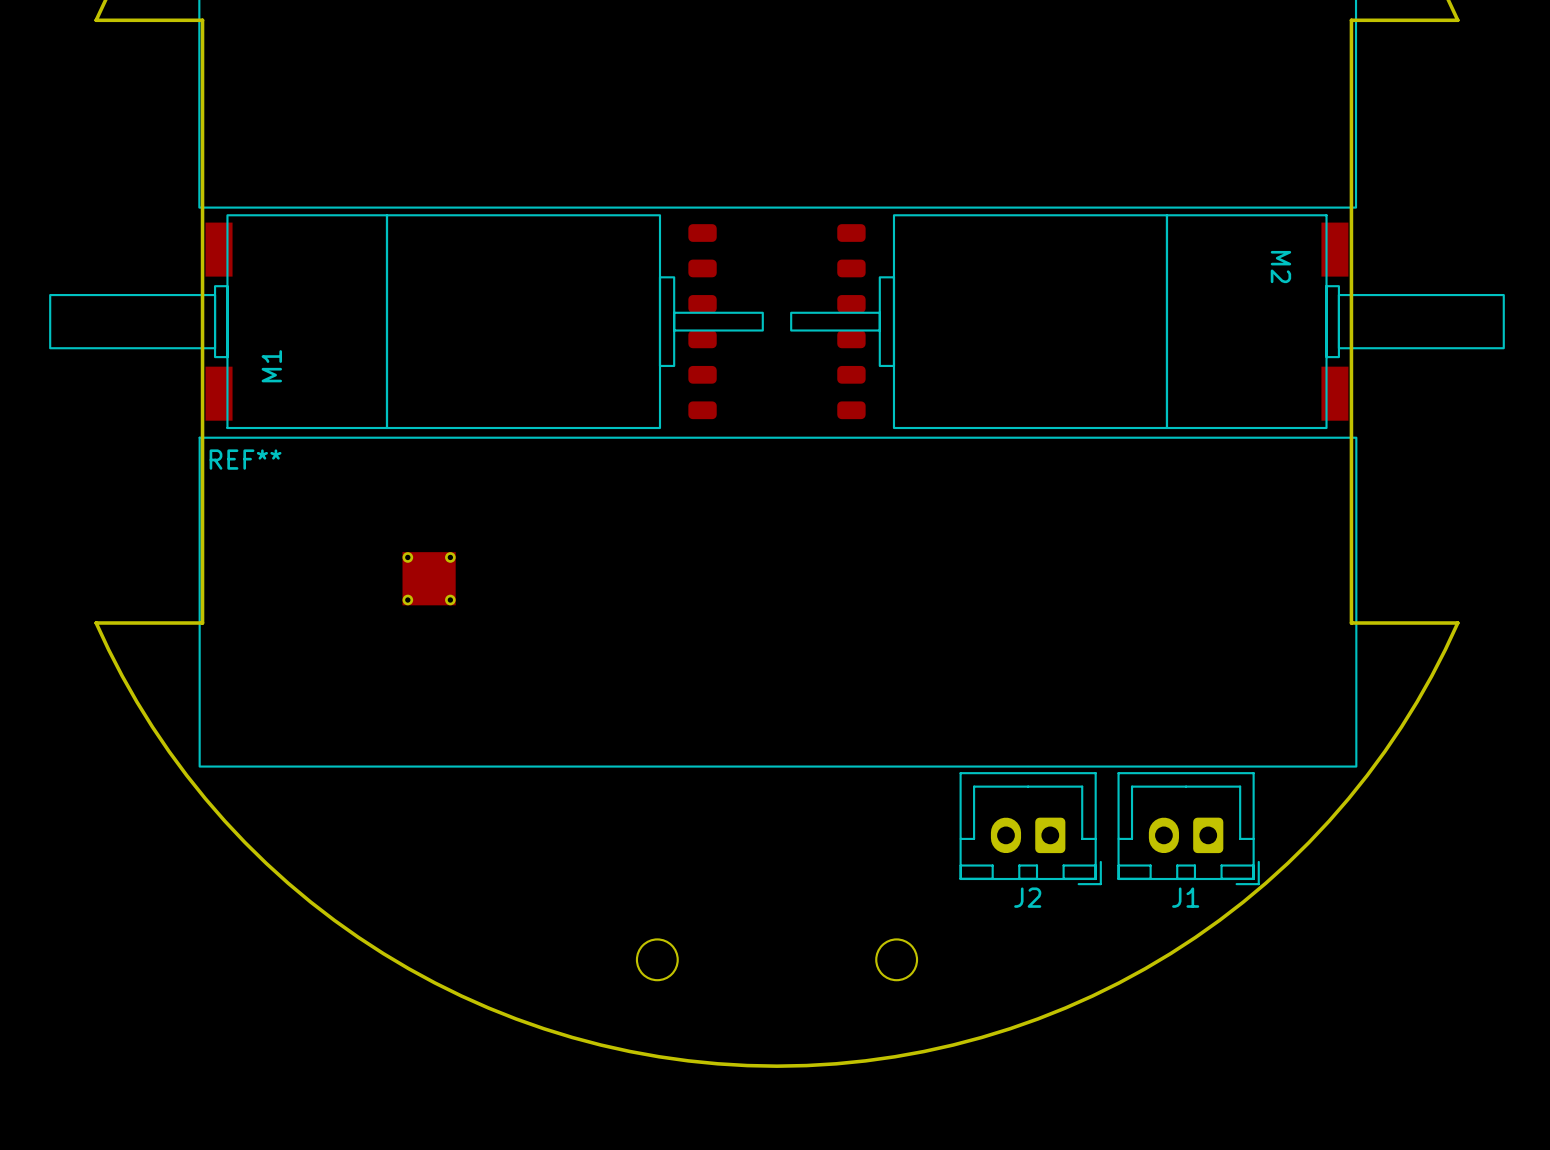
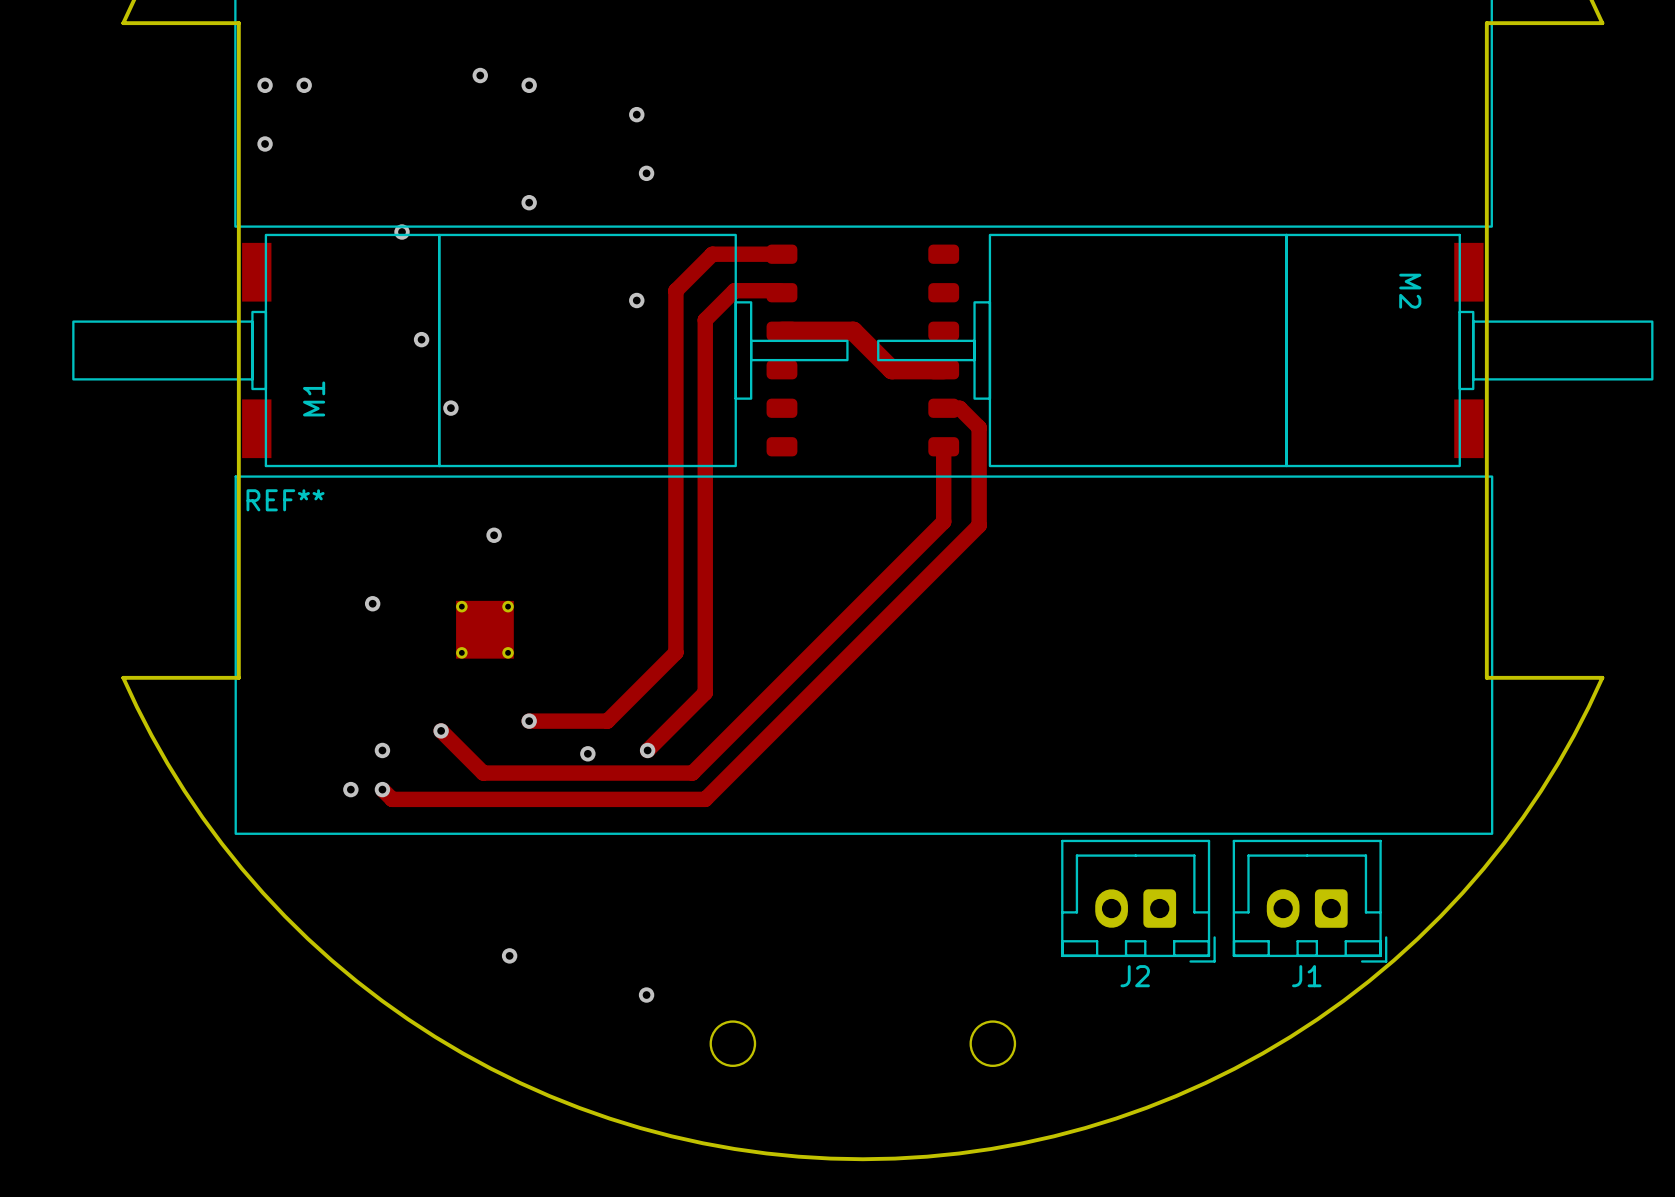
via: none -> (480, 75)
via: none -> (265, 85)
via: none -> (304, 85)
via: none -> (529, 85)
via: none -> (636, 114)
via: none -> (265, 143)
via: none -> (646, 173)
via: none -> (529, 202)
via: none -> (402, 232)
track: none -> (781, 254) (712, 254) (675, 290) (675, 652) (607, 721) (529, 721)
track: none -> (781, 292) (779, 290) (734, 290) (705, 320) (705, 692) (647, 750)
via: none -> (636, 300)
track: none -> (781, 331) (853, 331) (891, 369) (943, 369)
via: none -> (421, 339)
via: none -> (450, 408)
track: none -> (943, 408) (959, 408) (979, 427) (979, 525) (705, 799) (392, 799) (382, 789)
track: none -> (943, 446) (943, 521) (692, 773) (483, 773) (441, 730)
via: none -> (494, 535)
via: none -> (372, 603)
via: none -> (529, 721)
via: none -> (441, 730)
via: none -> (382, 750)
via: none -> (647, 750)
via: none -> (587, 753)
via: none -> (350, 789)
via: none -> (382, 789)
via: none -> (509, 955)
via: none -> (646, 995)

